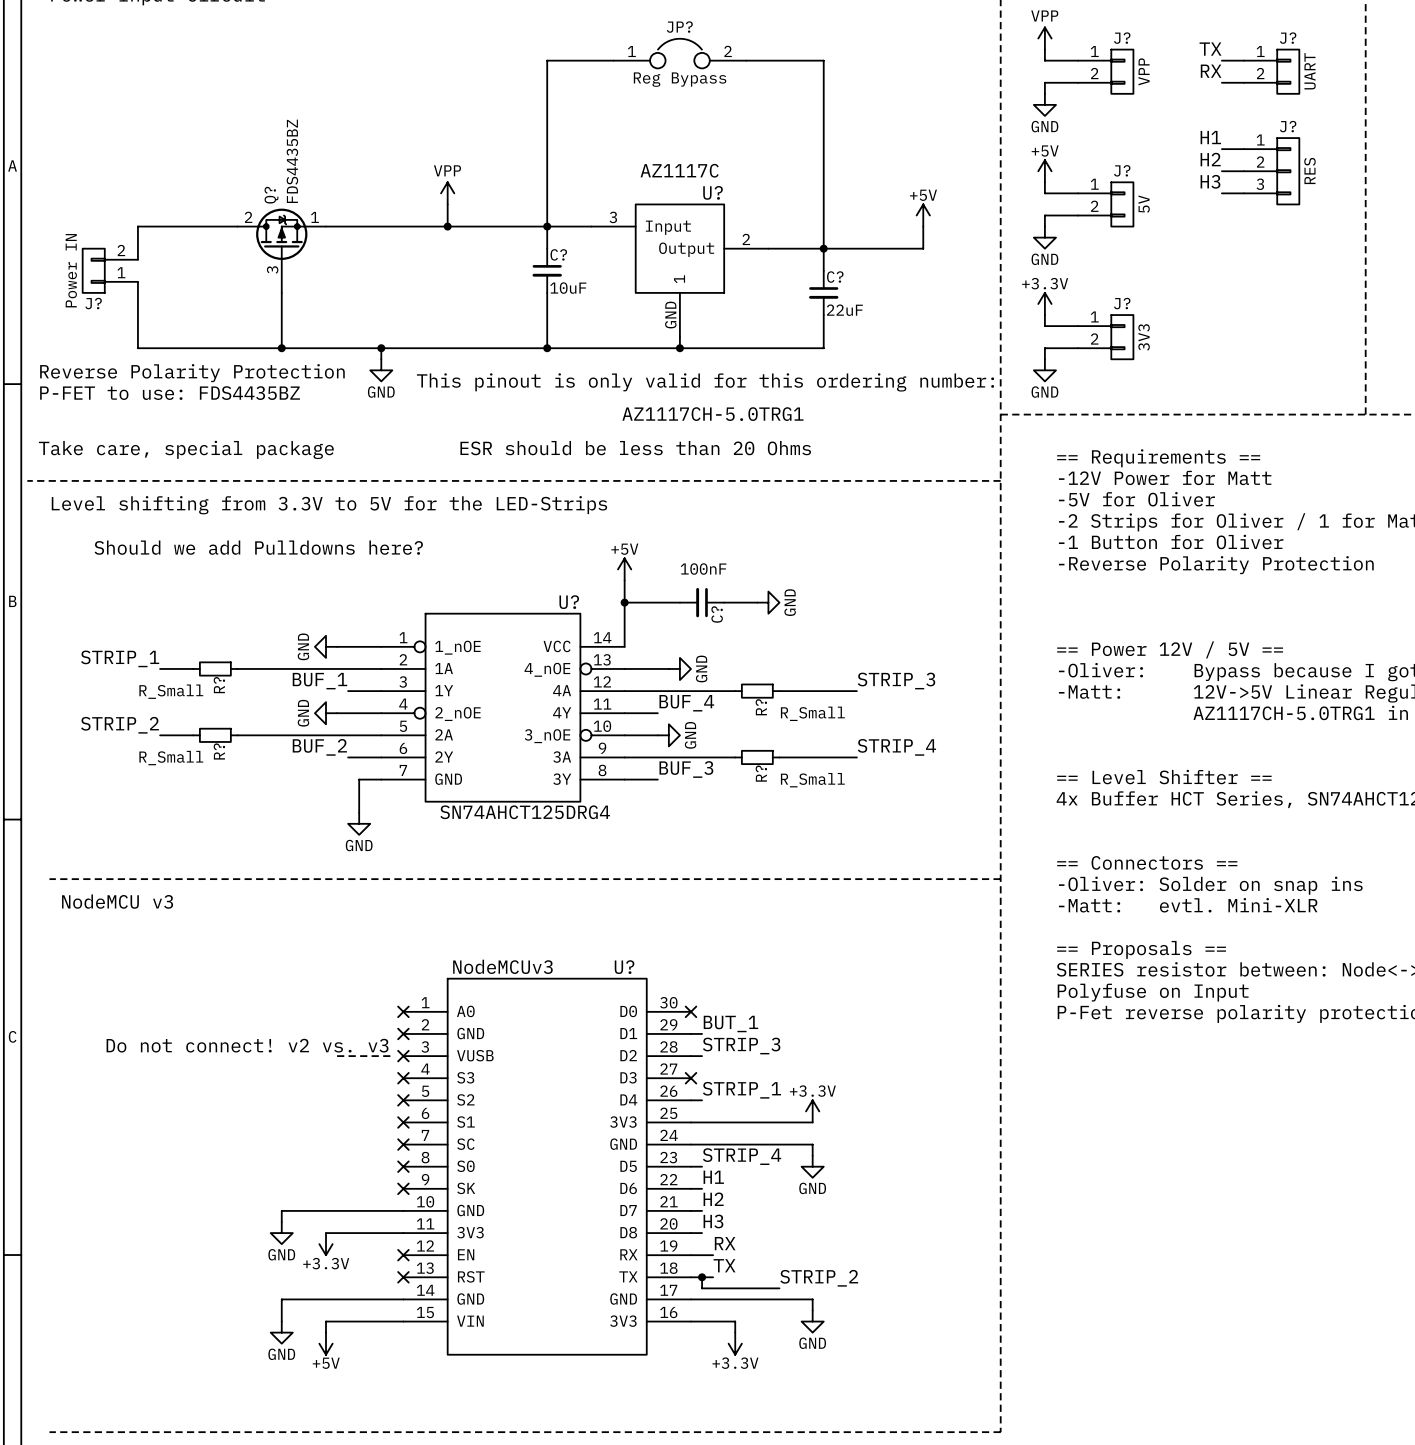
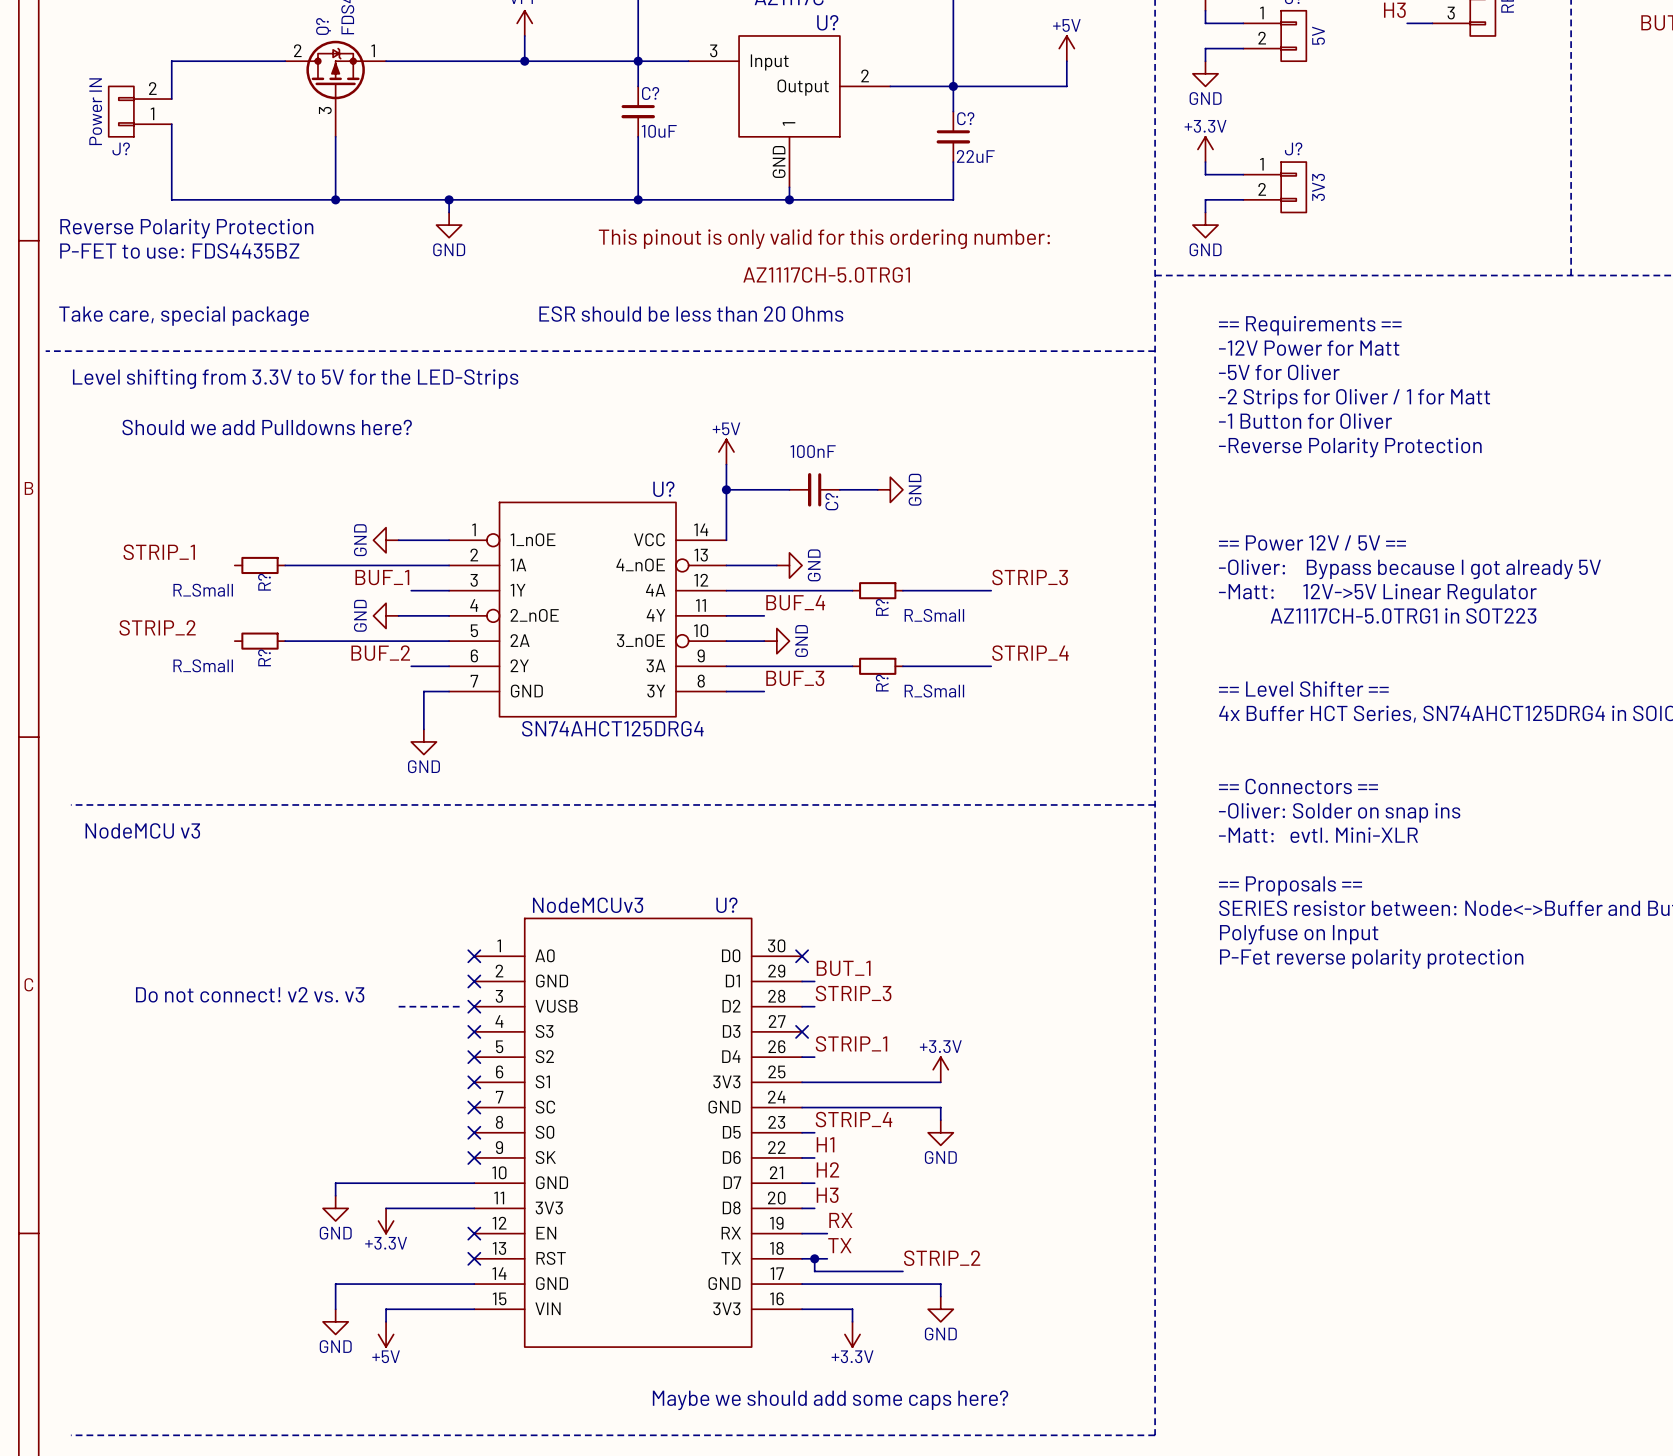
wire: (160, 668) (193, 668) -> none
wire: (160, 735) (193, 735) -> none
text: none -> Maybe we should add some caps here? (830, 1400)

